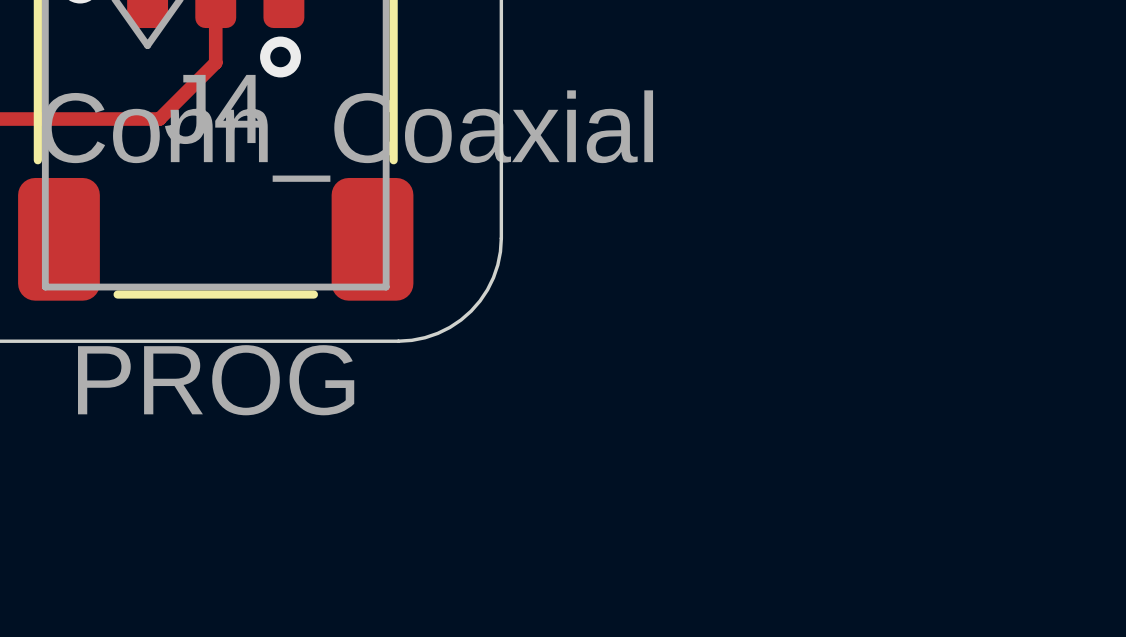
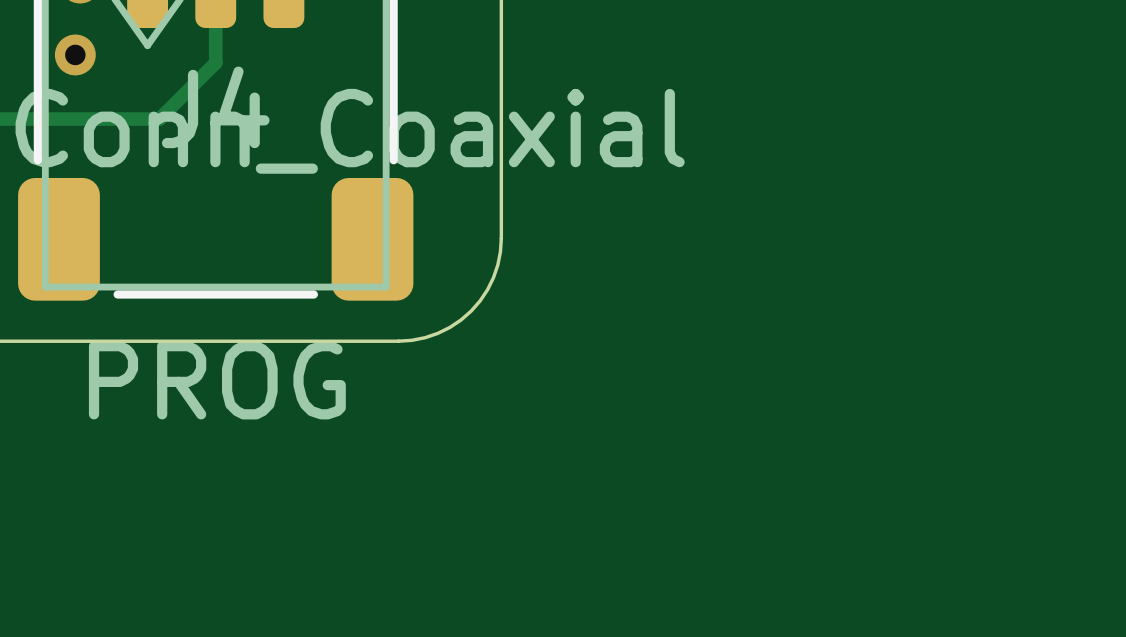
via: none -> (75, 54)
via: (280, 57) -> none

